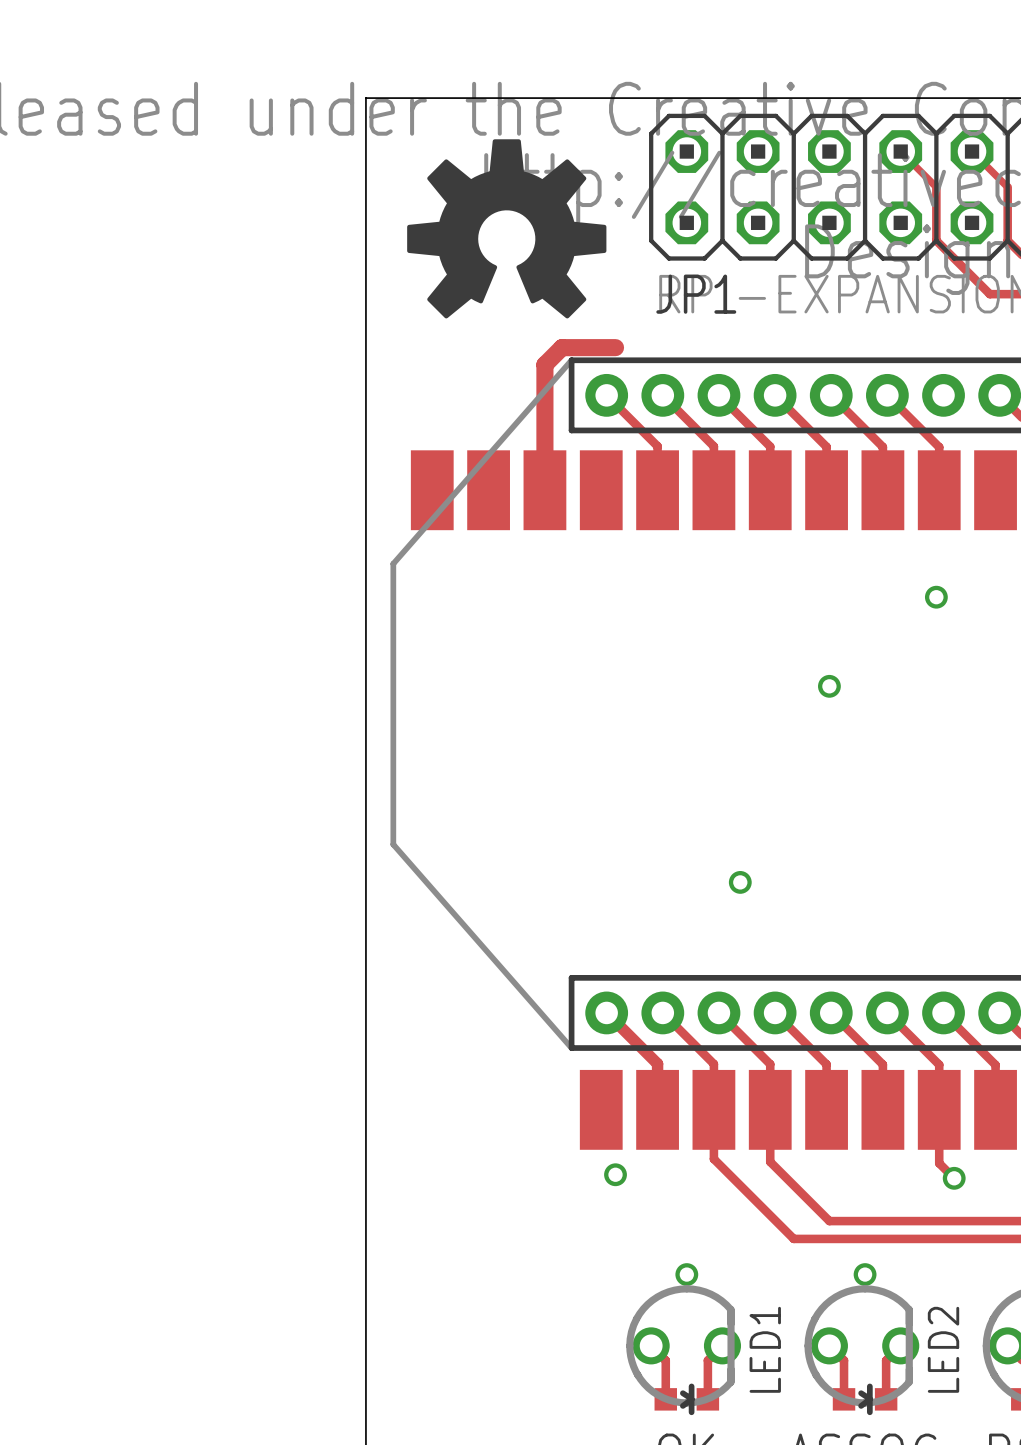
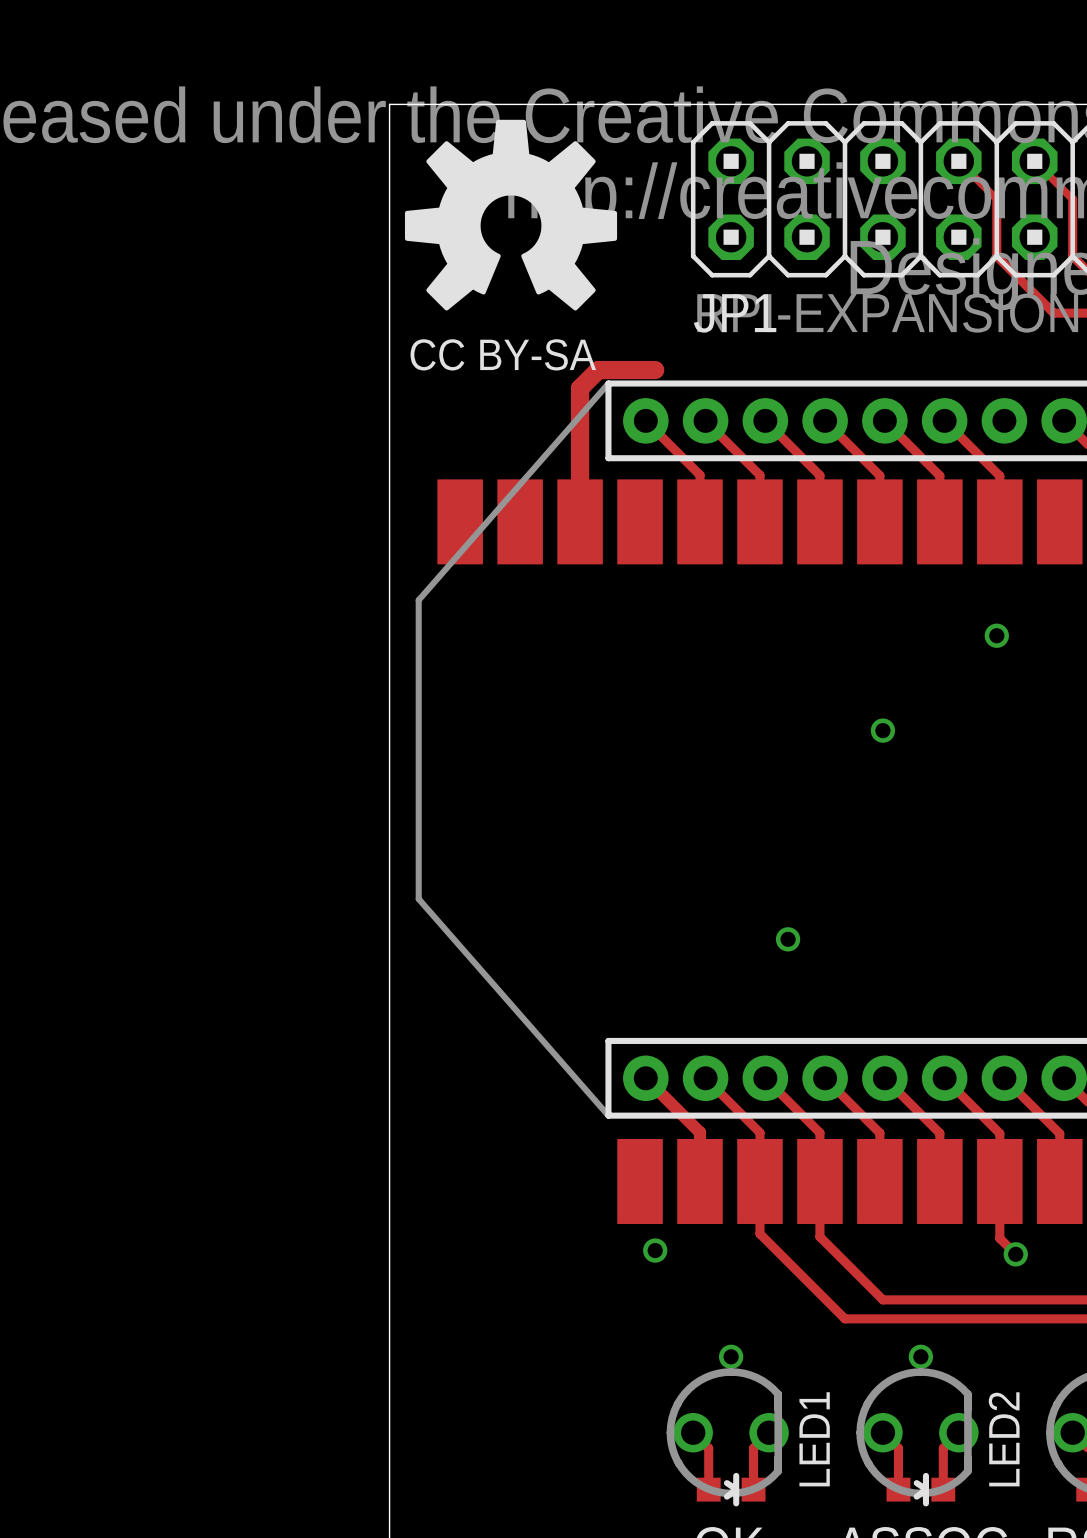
drawing position: (506, 228) -> (511, 215)
text: none -> CC BY-SA (503, 354)

